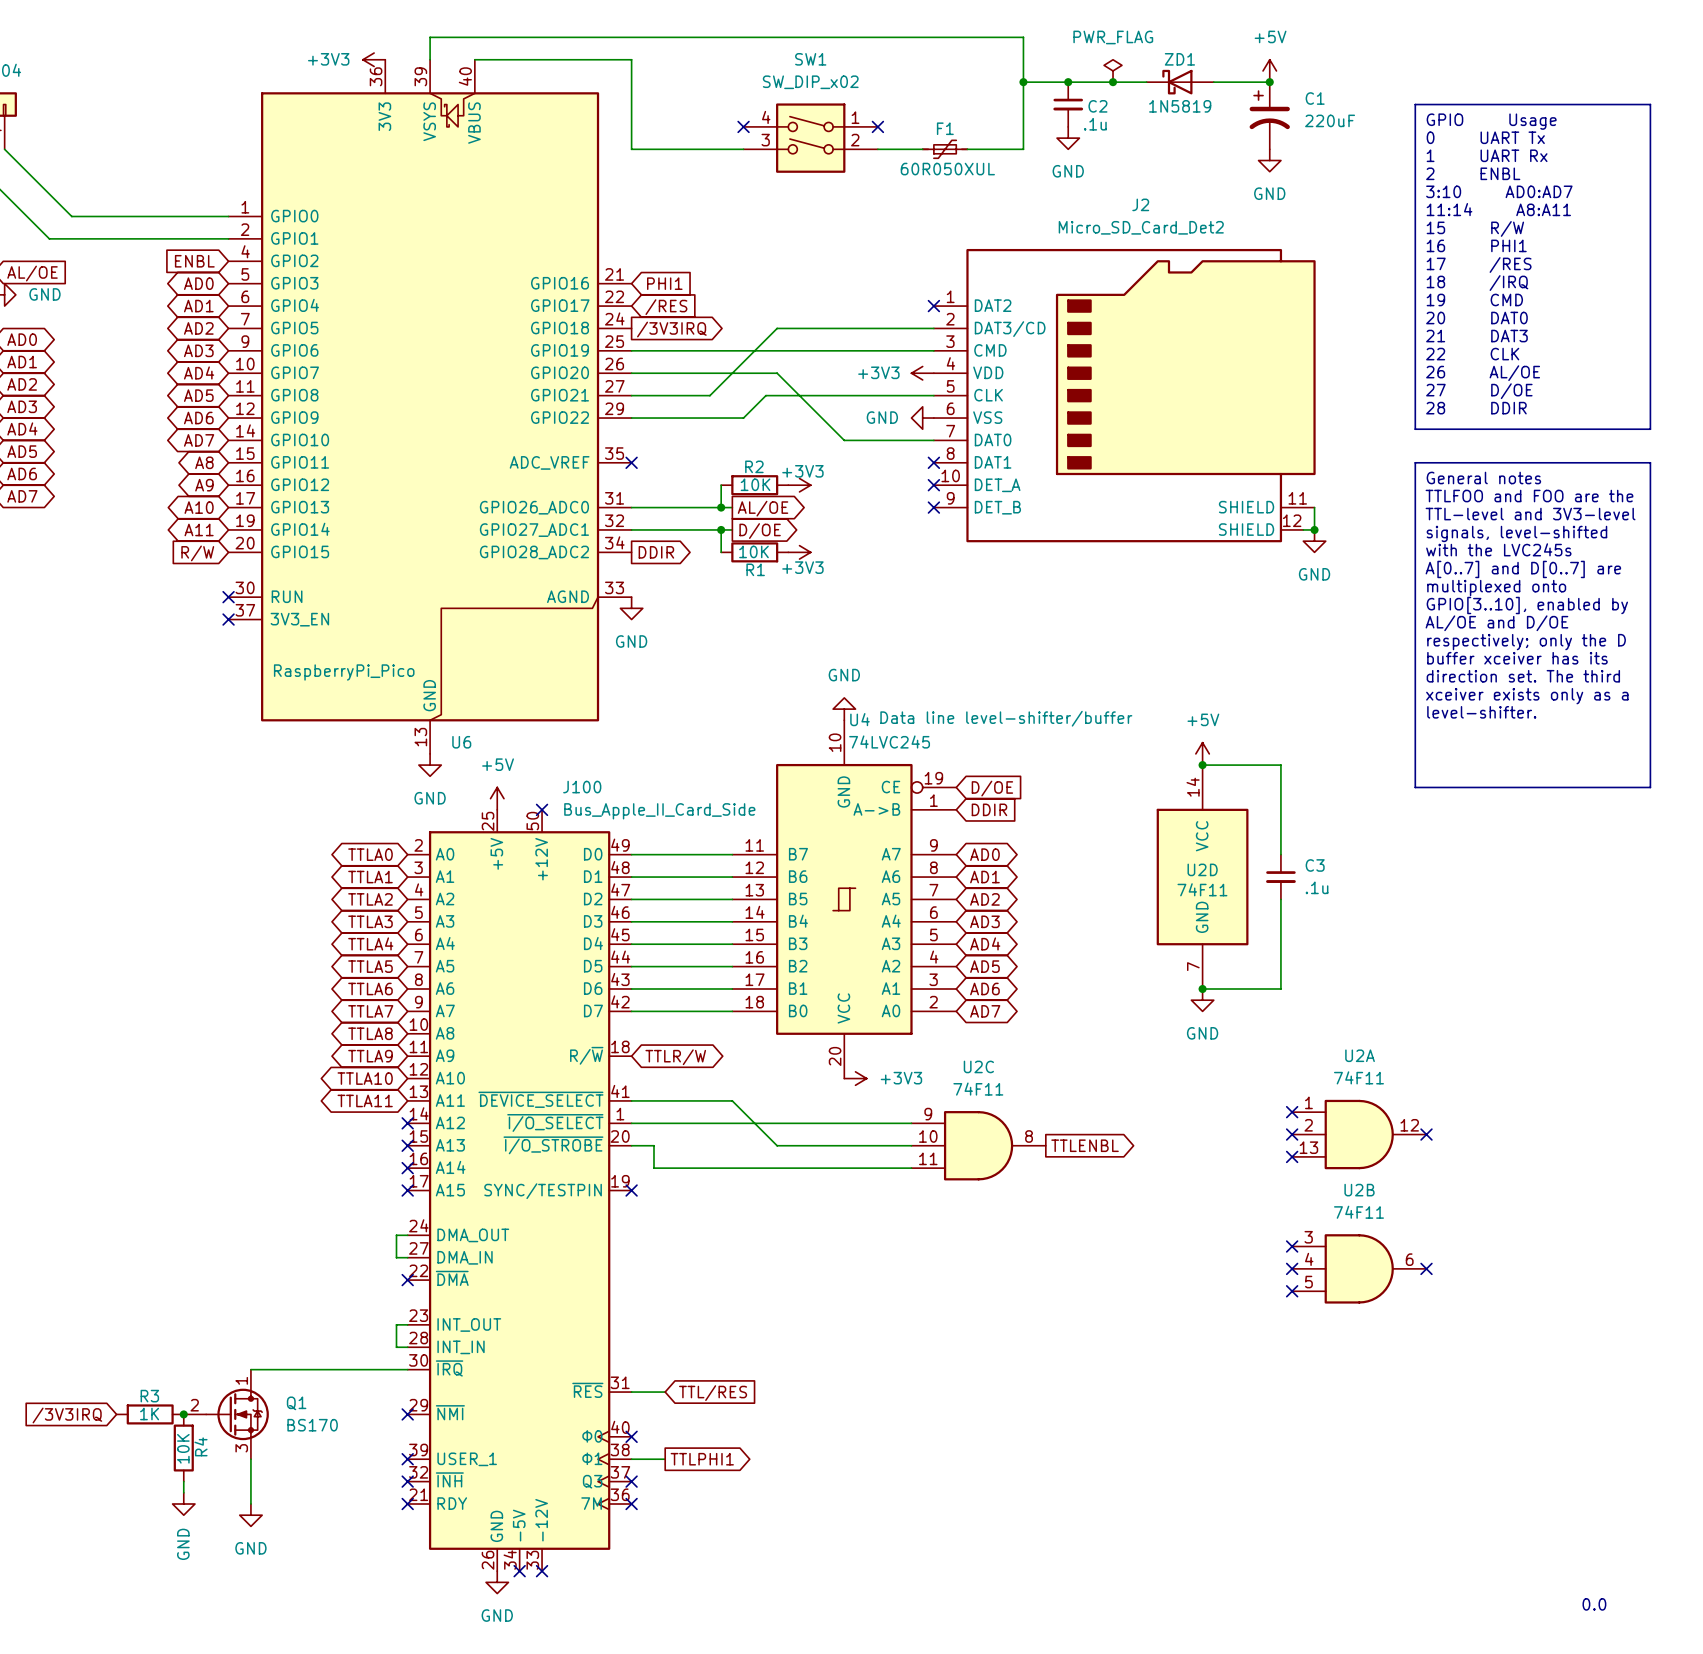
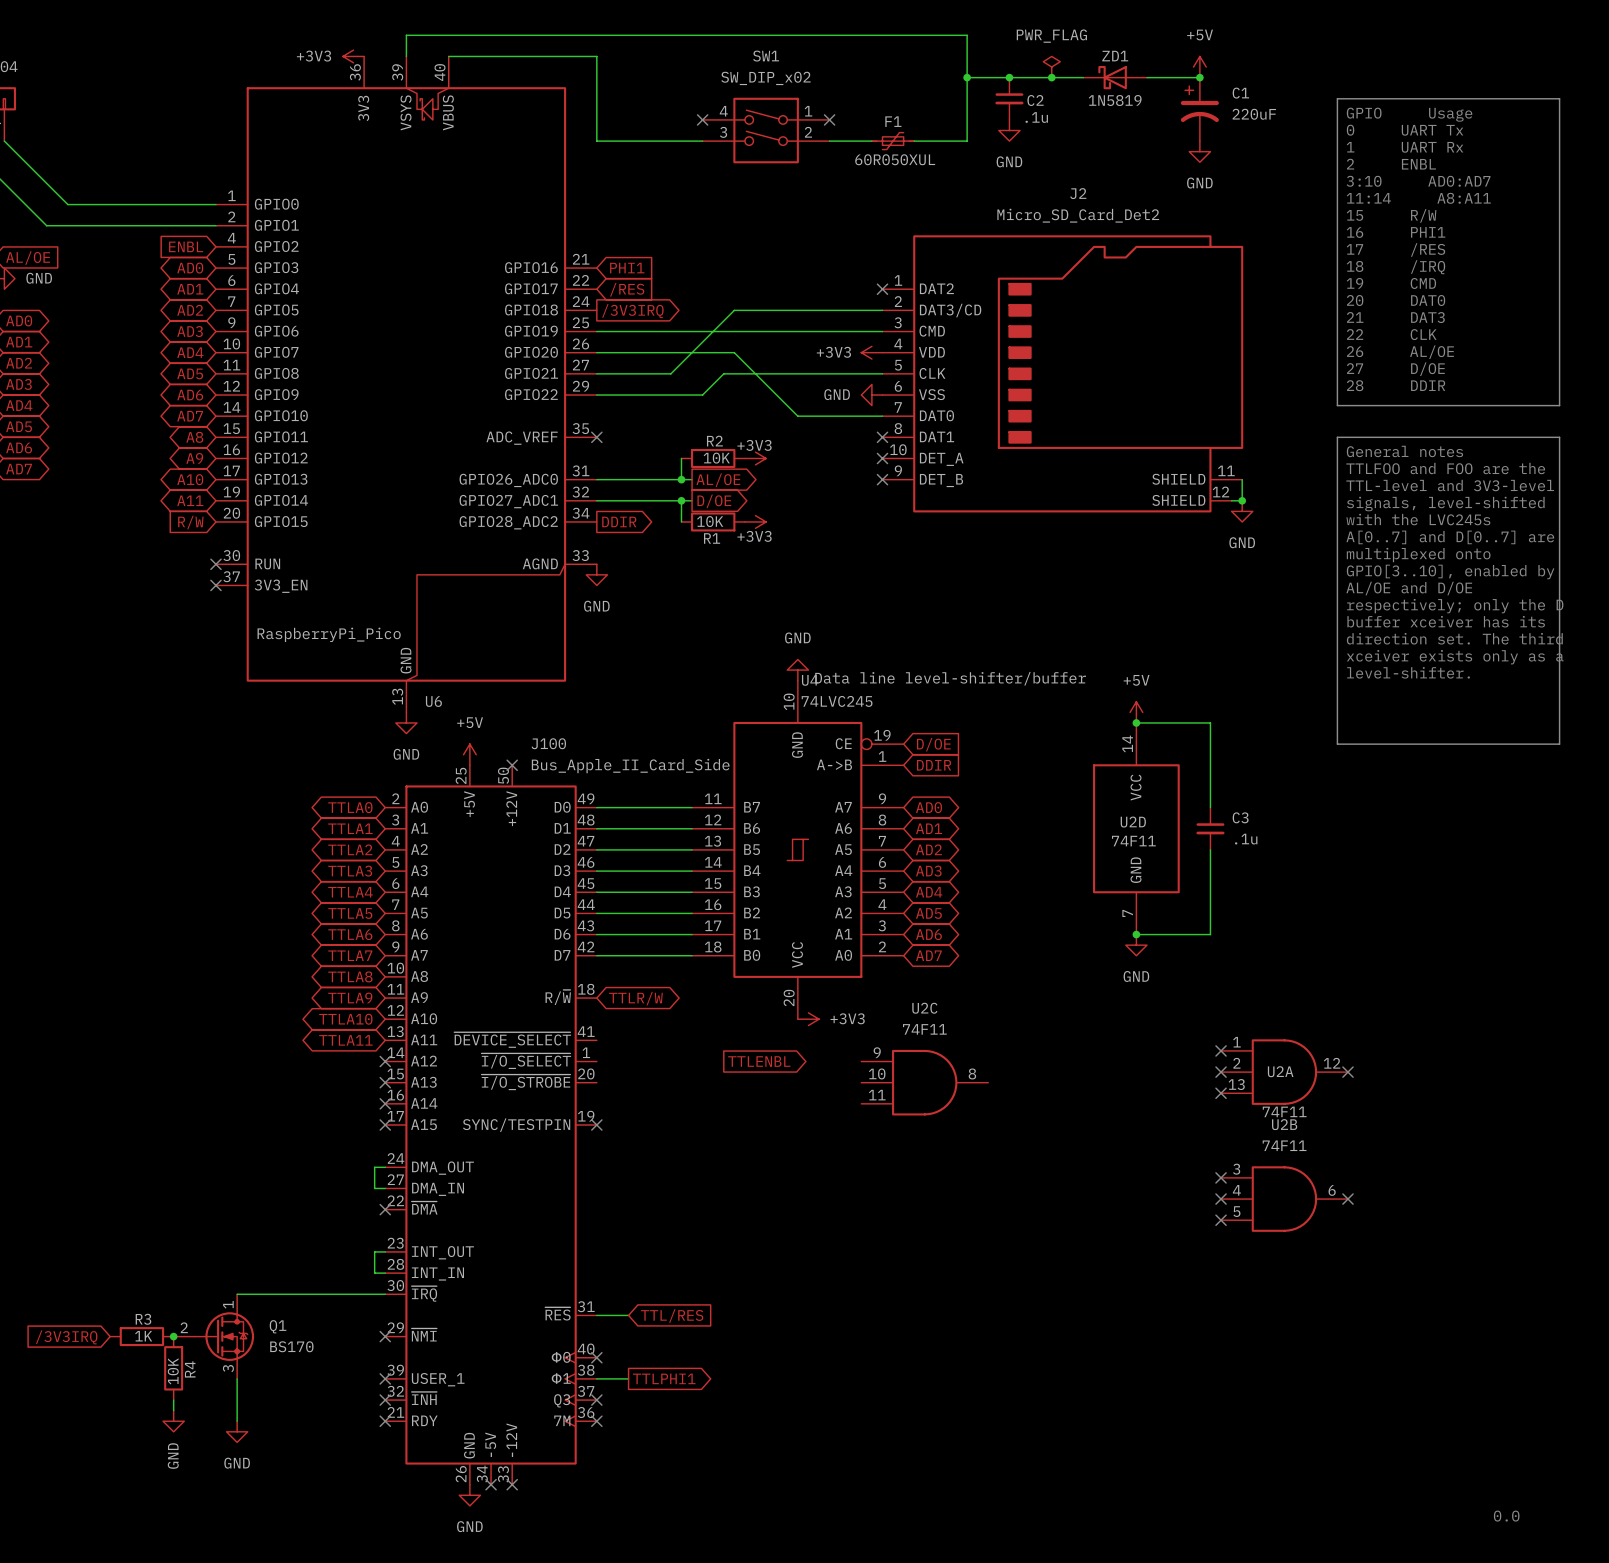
U2A name position: U2A (1360, 1055) -> U2A (1280, 1071)
U2A value position: 74F11 (1358, 1077) -> 74F11 (1284, 1111)
wire: (631, 1100) (732, 1100) (777, 1145) (911, 1145) -> none
wire: (631, 1123) (911, 1123) -> none
global label: none -> TTLENBL (759, 1061)
wire: (631, 1145) (653, 1145) (653, 1168) (911, 1168) -> none
global label: TTLENBL (1085, 1145) -> none

